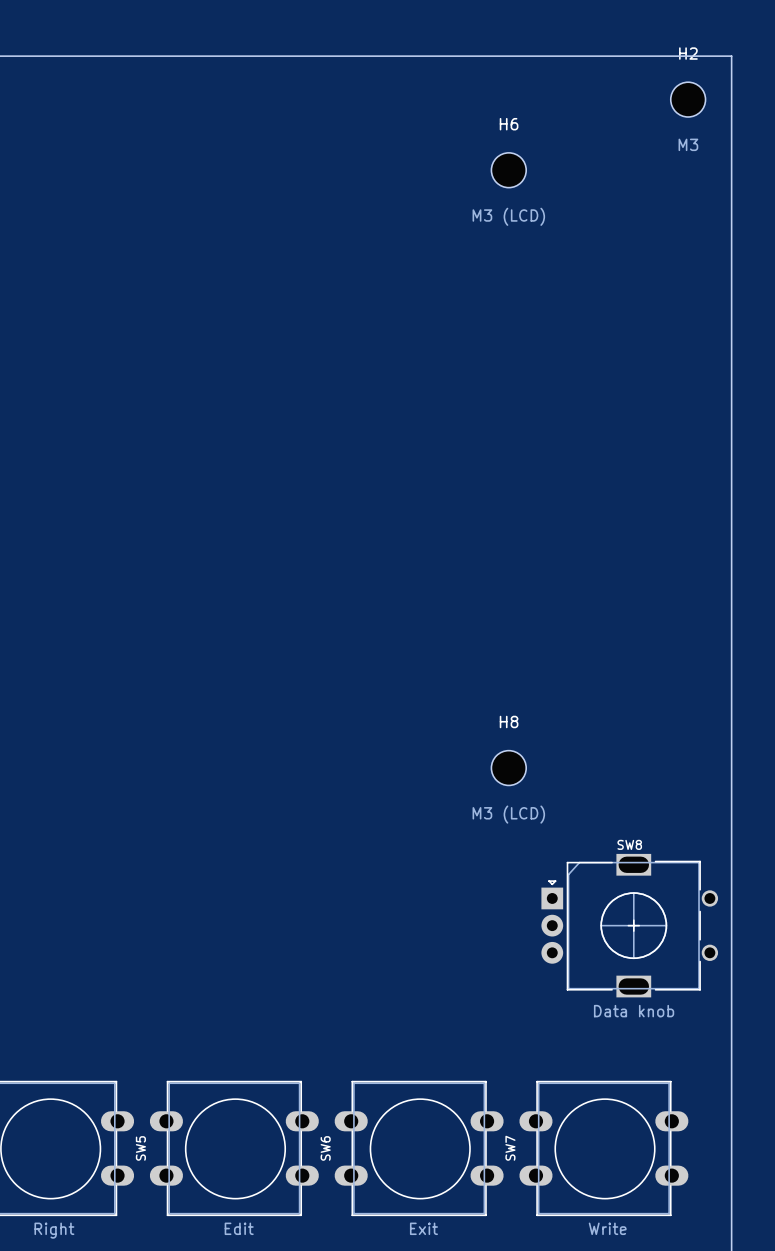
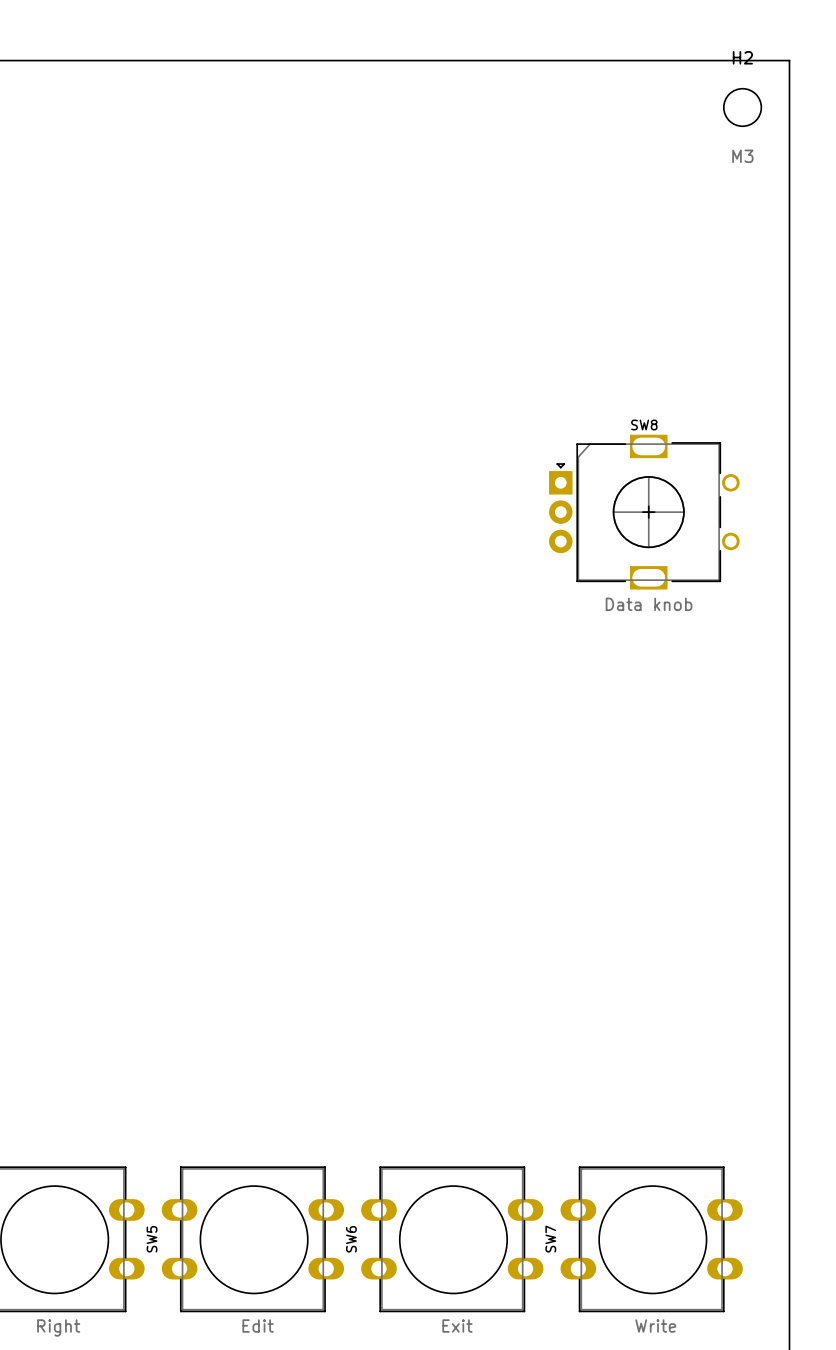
H6: M3 (LCD) (508, 170) -> none
H8: M3 (LCD) (508, 768) -> none
SW8 position: (629, 925) -> (644, 512)

